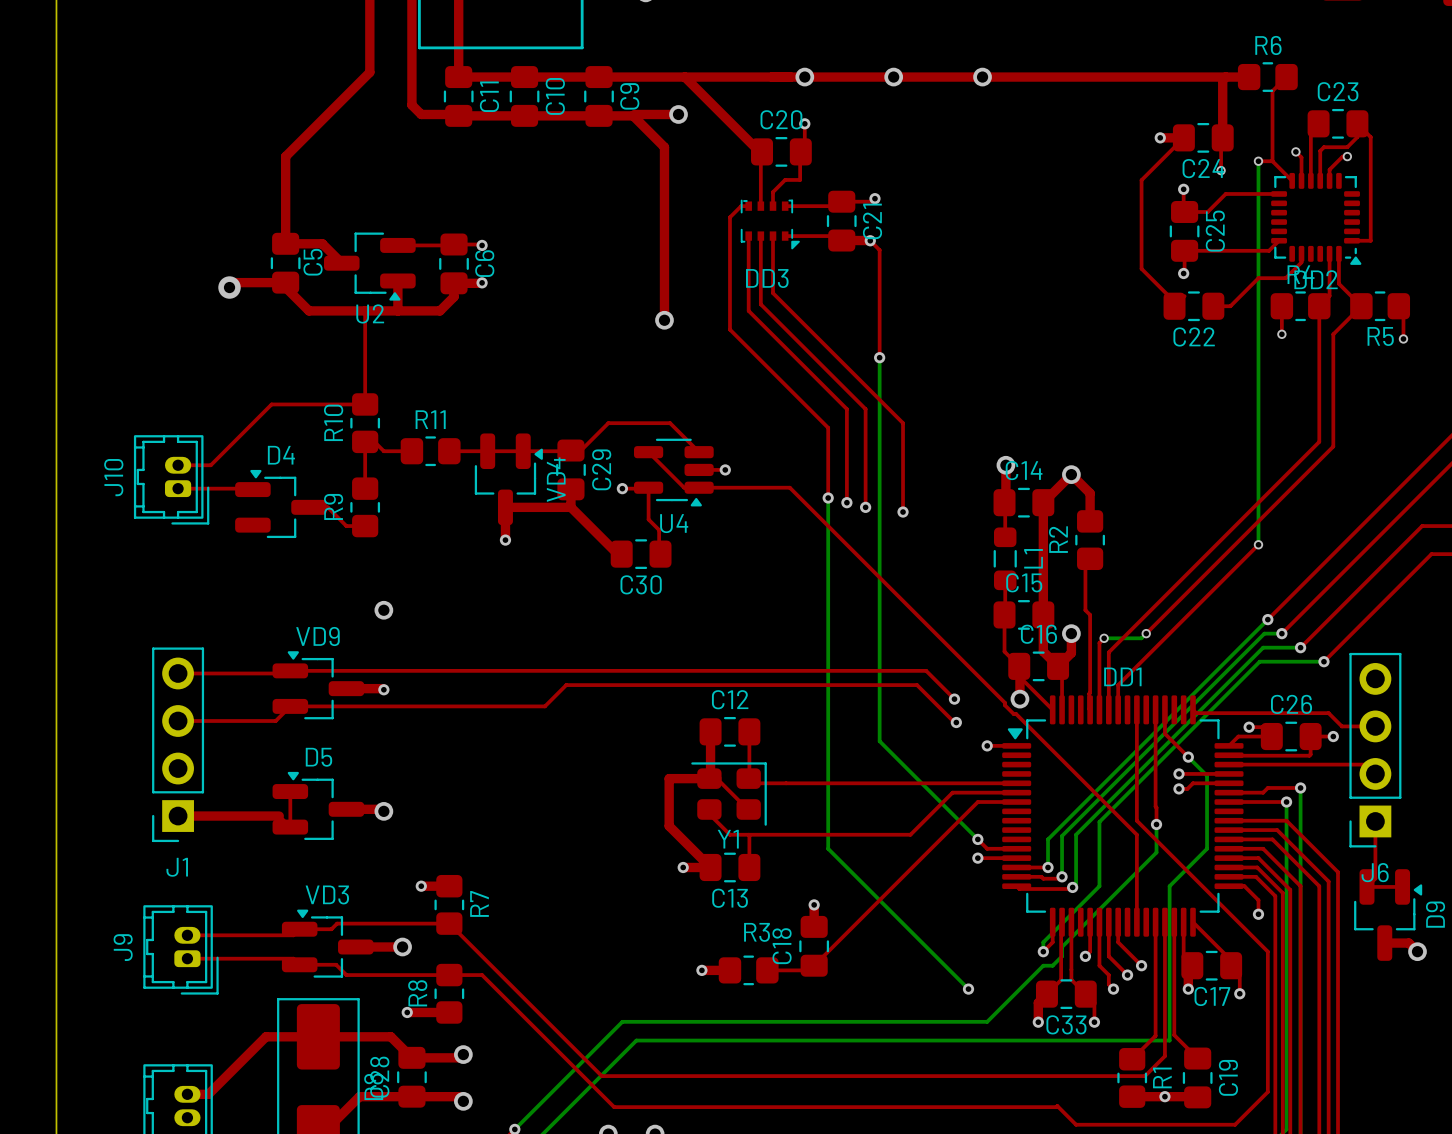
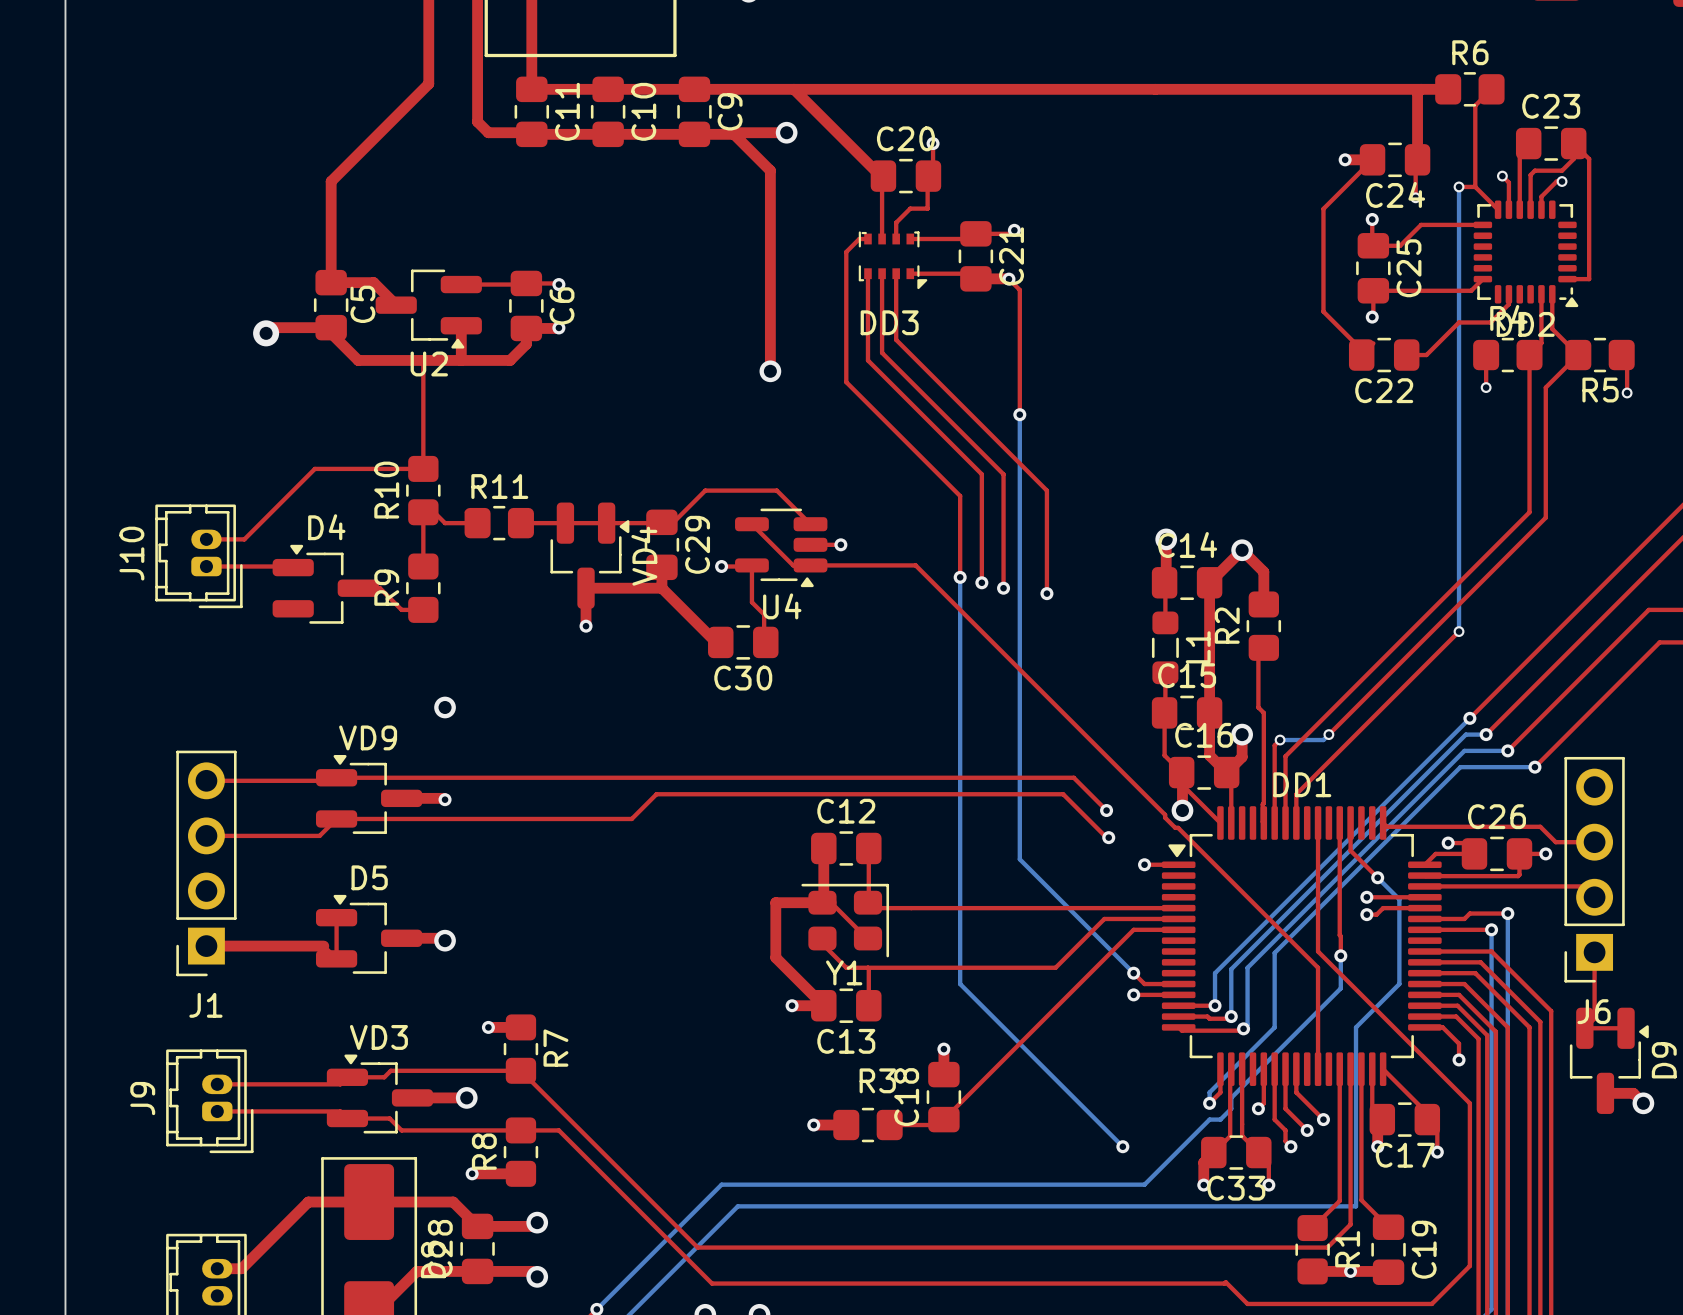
via: (804, 77) -> none
via: (893, 77) -> none
via: (982, 77) -> none

